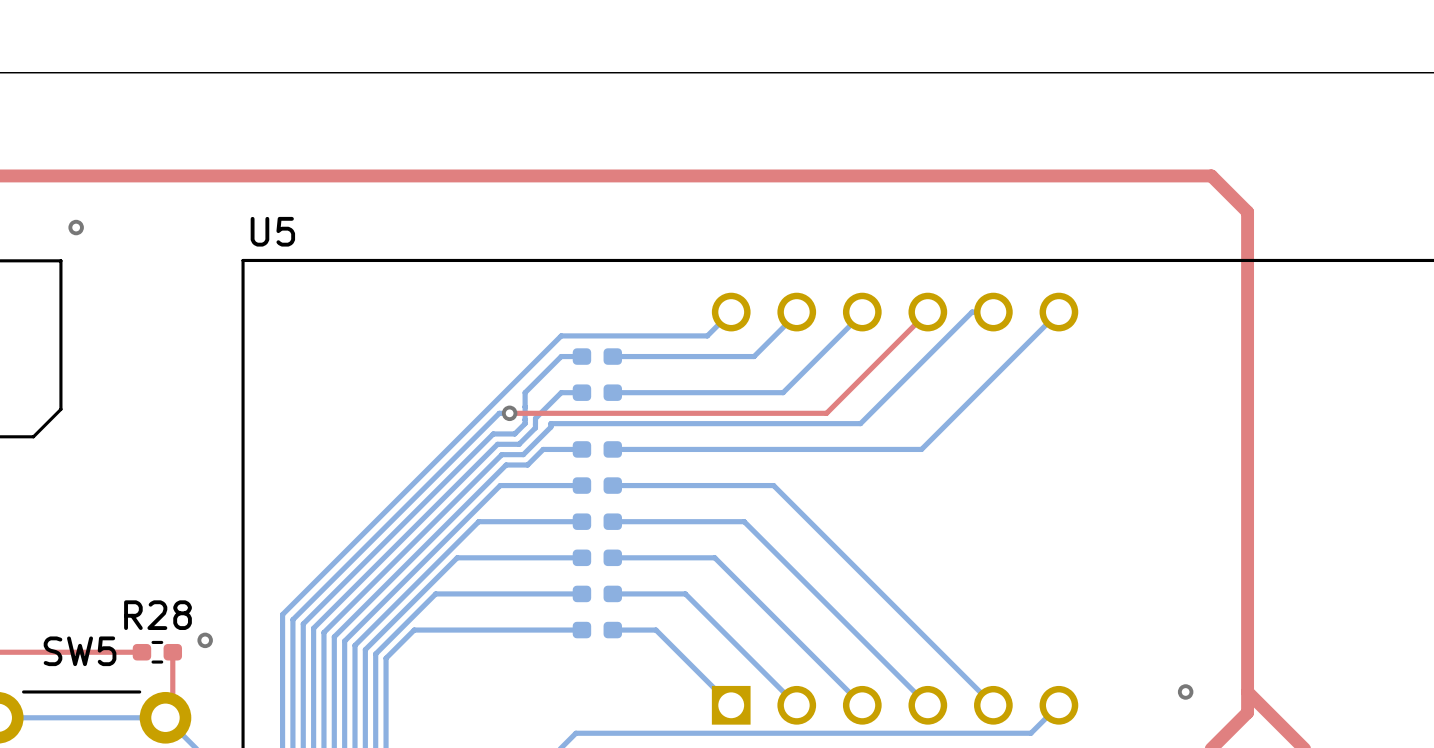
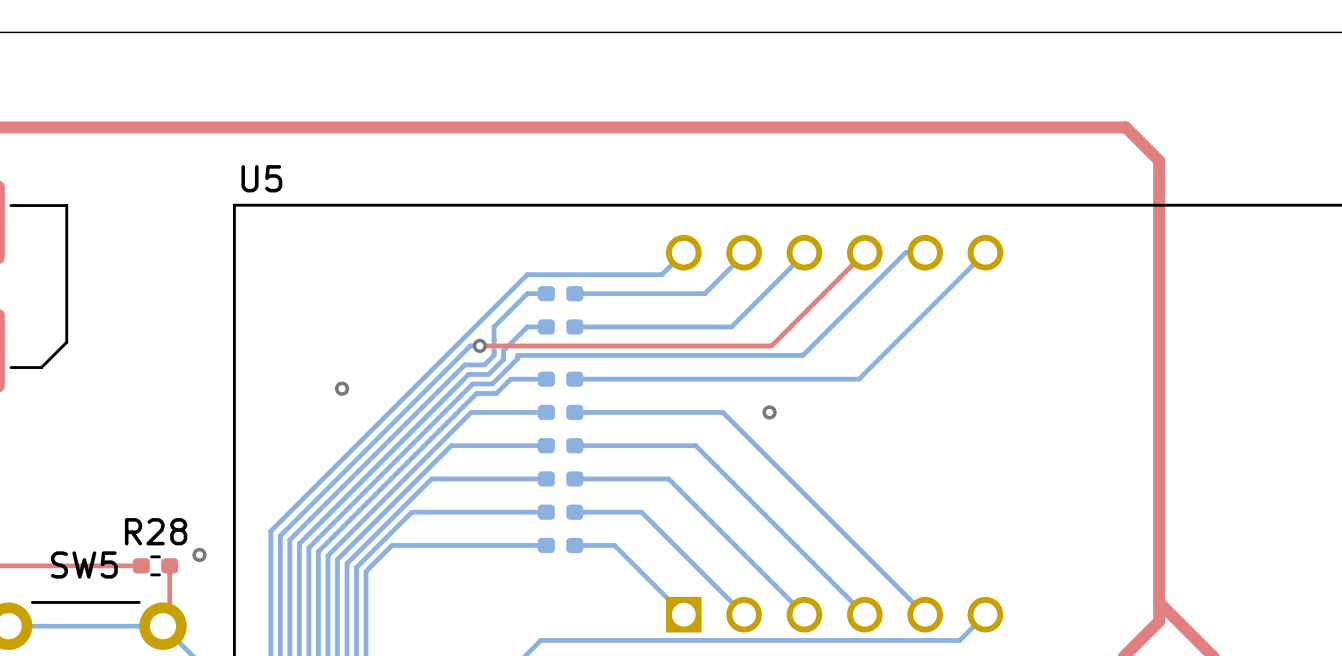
via: (76, 227) -> none
via: none -> (342, 388)
via: none -> (769, 412)
via: (1185, 691) -> none

